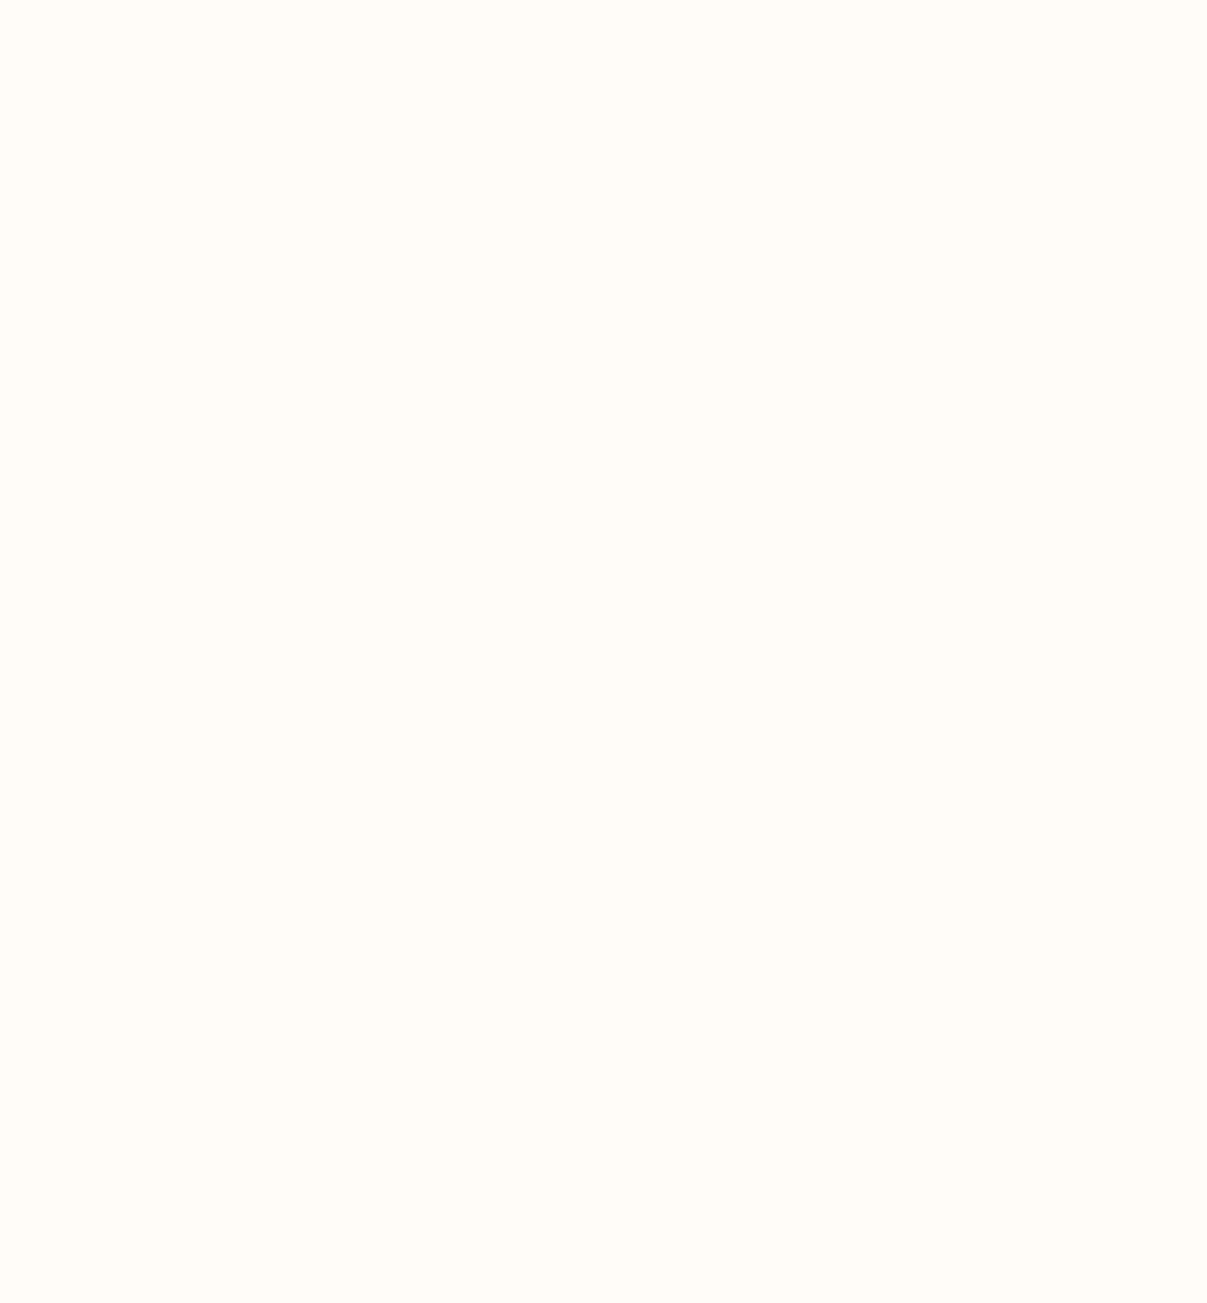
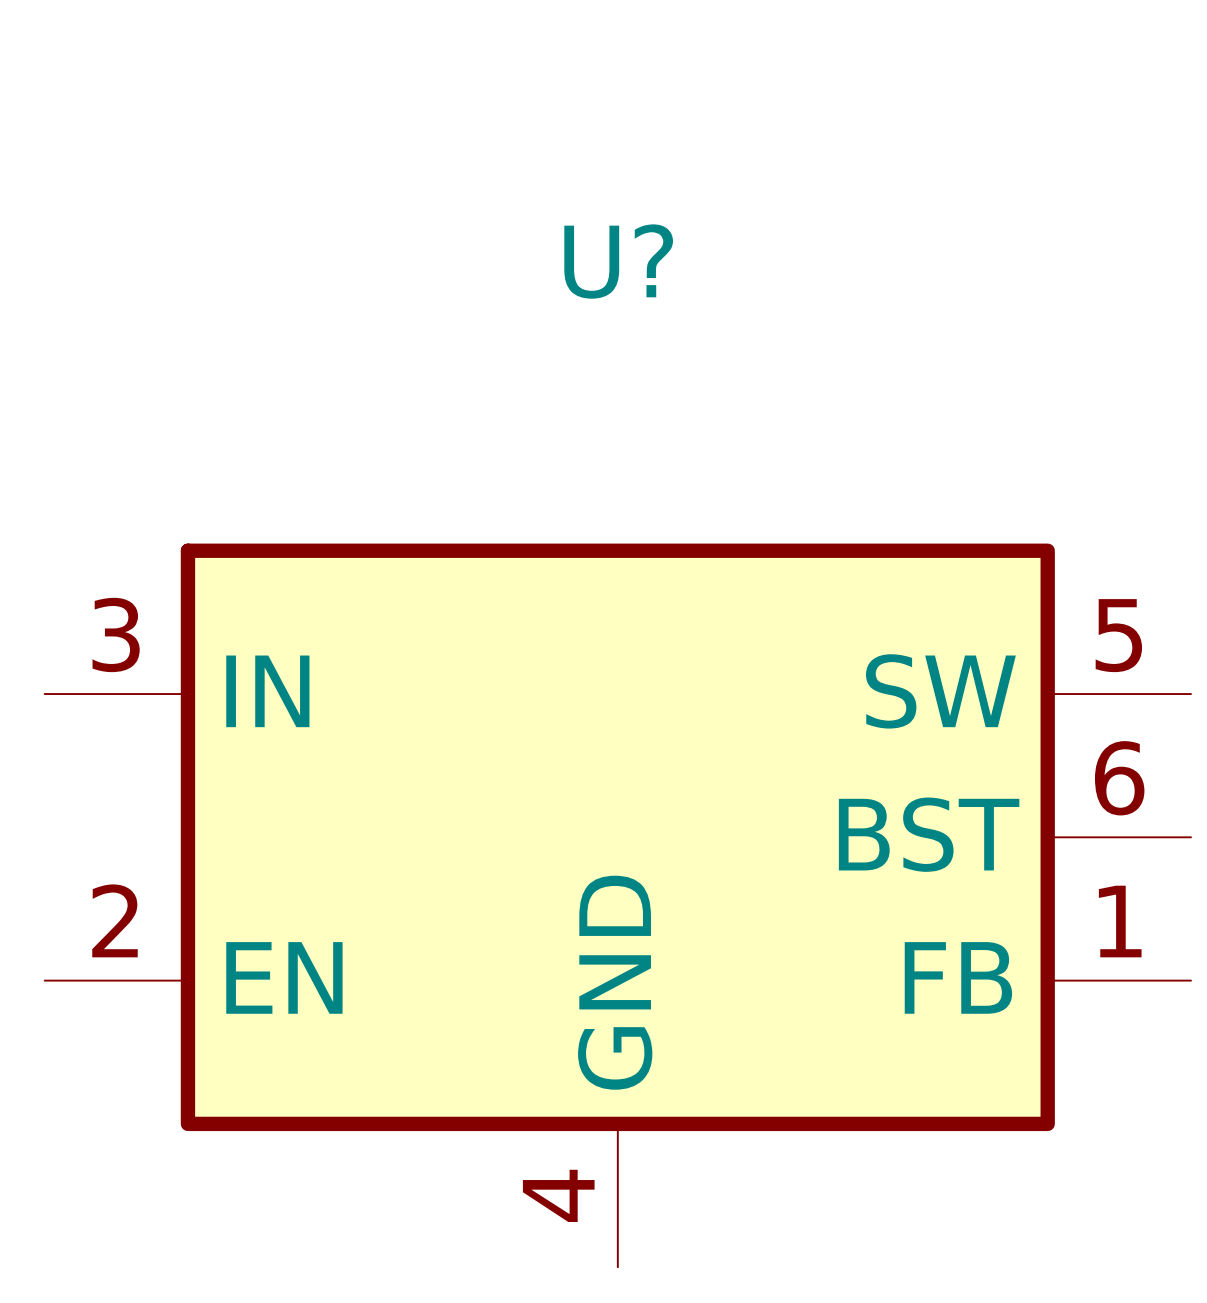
U?: none -> (617, 905)

